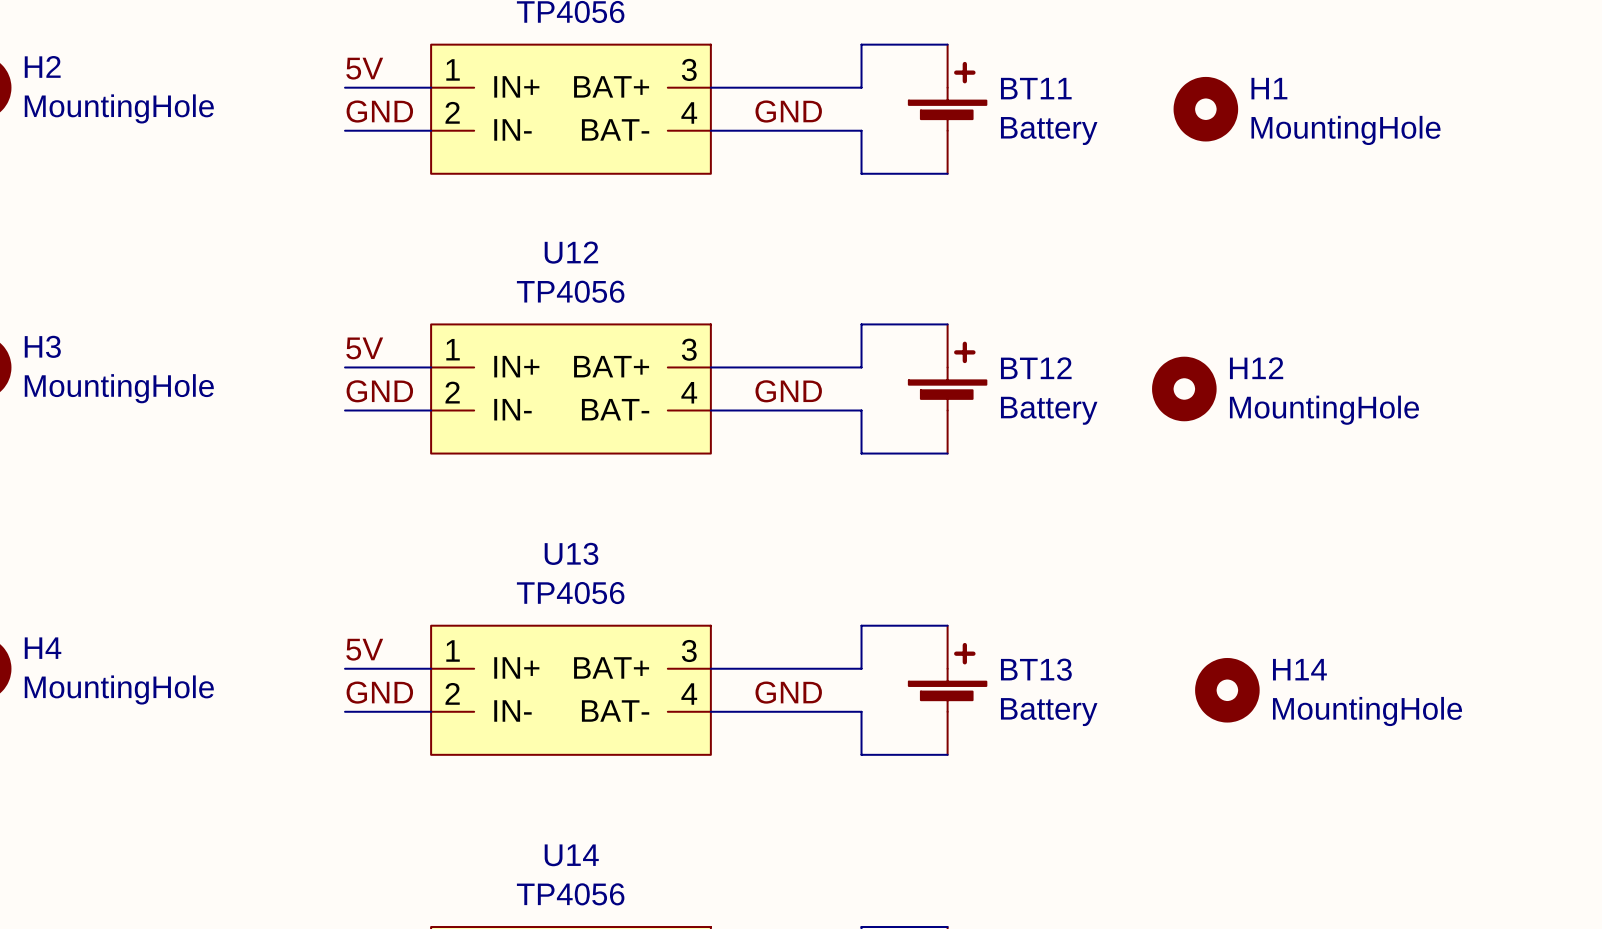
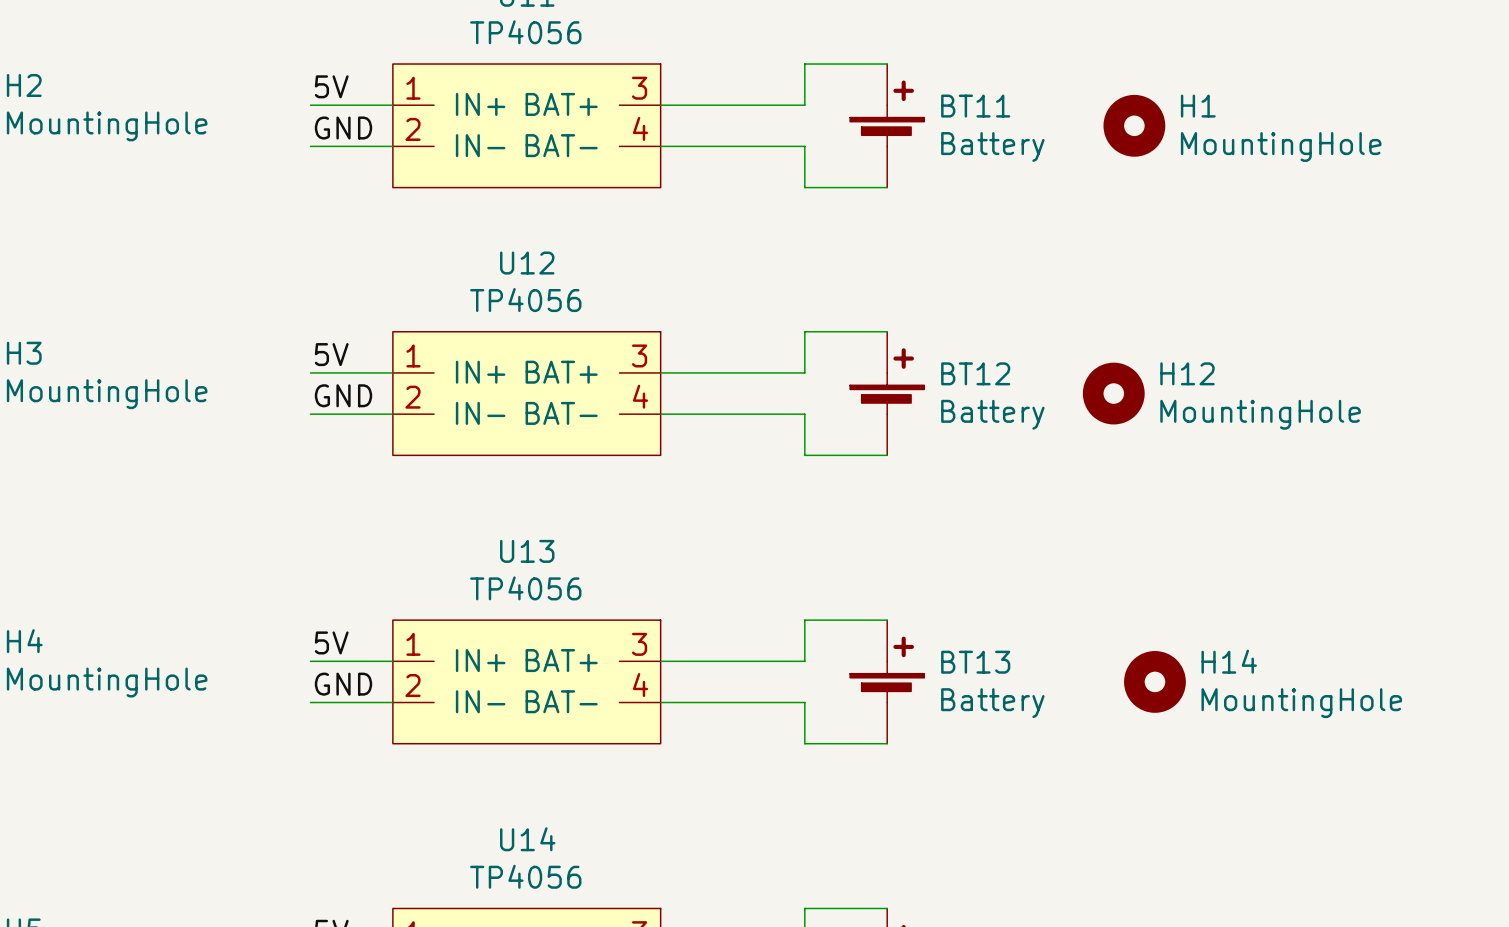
label: GND (788, 111) -> none
label: GND (788, 391) -> none
label: GND (788, 692) -> none

